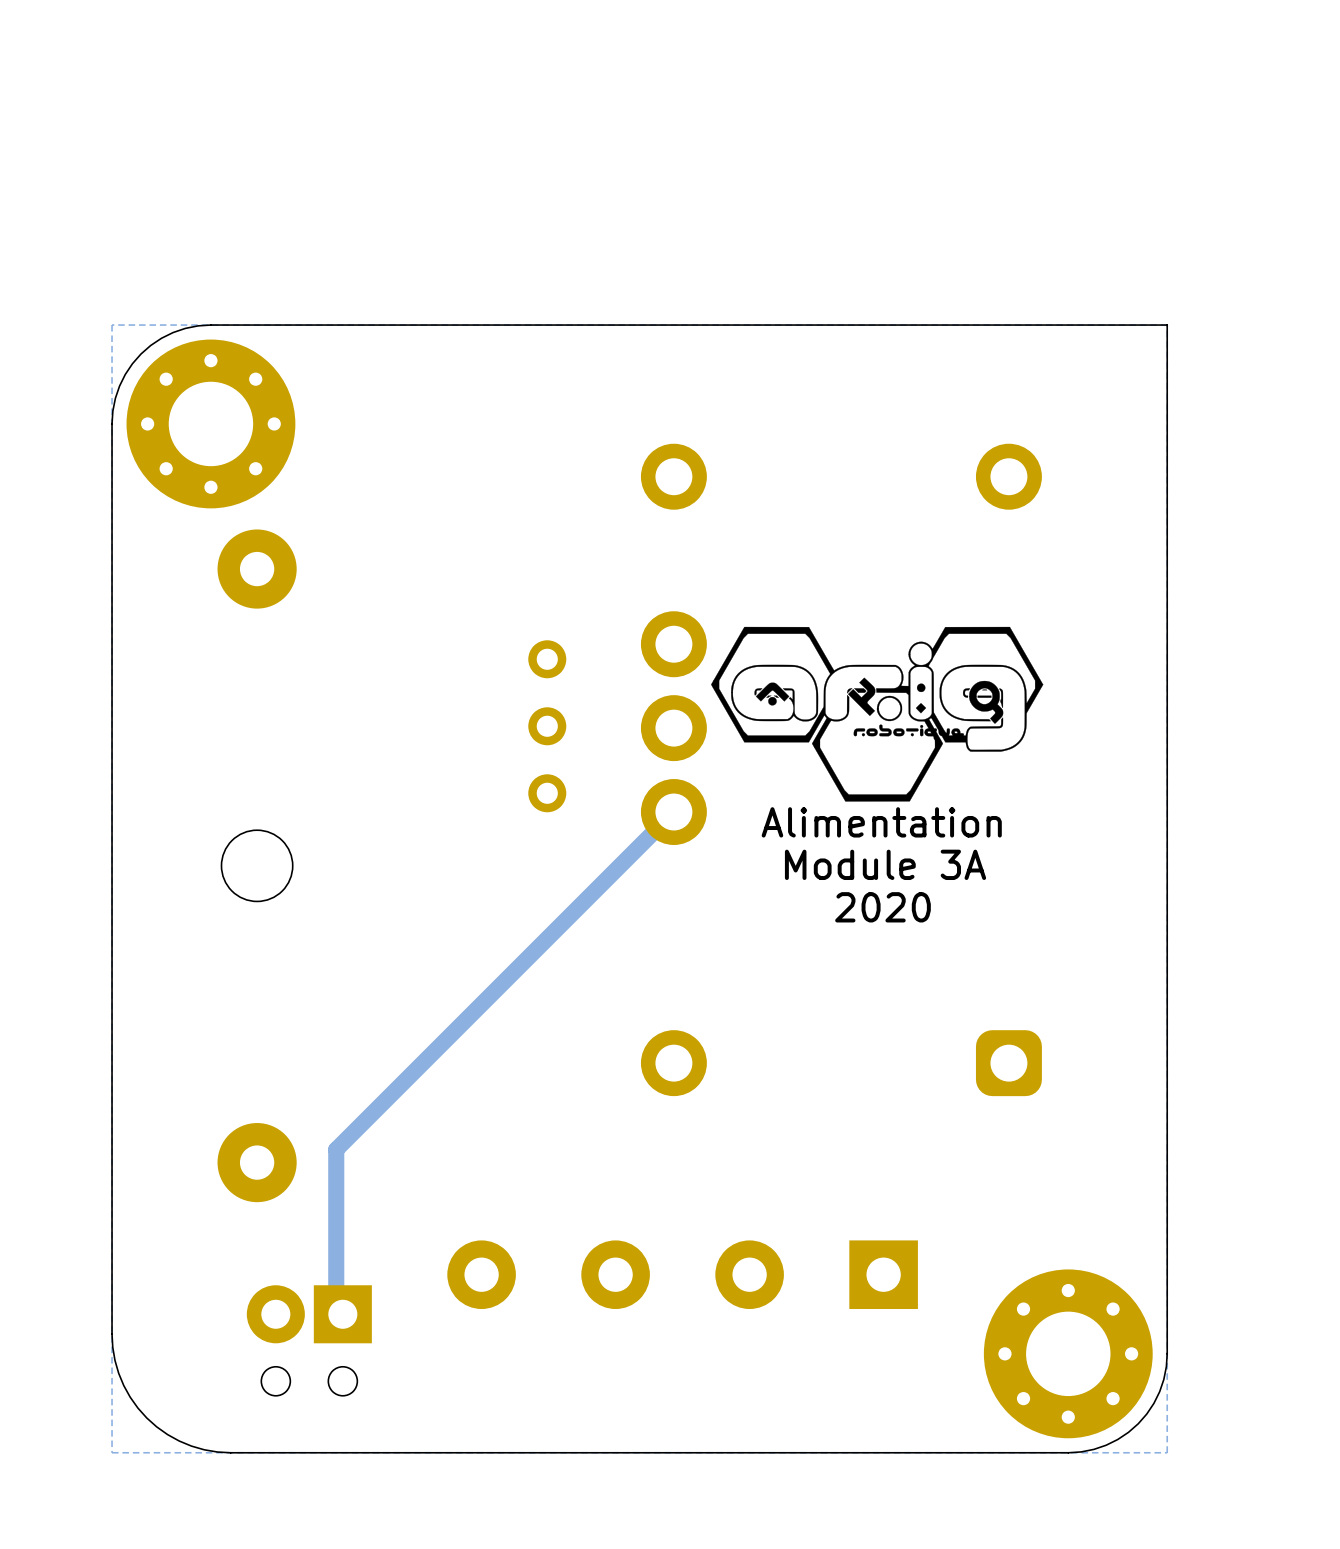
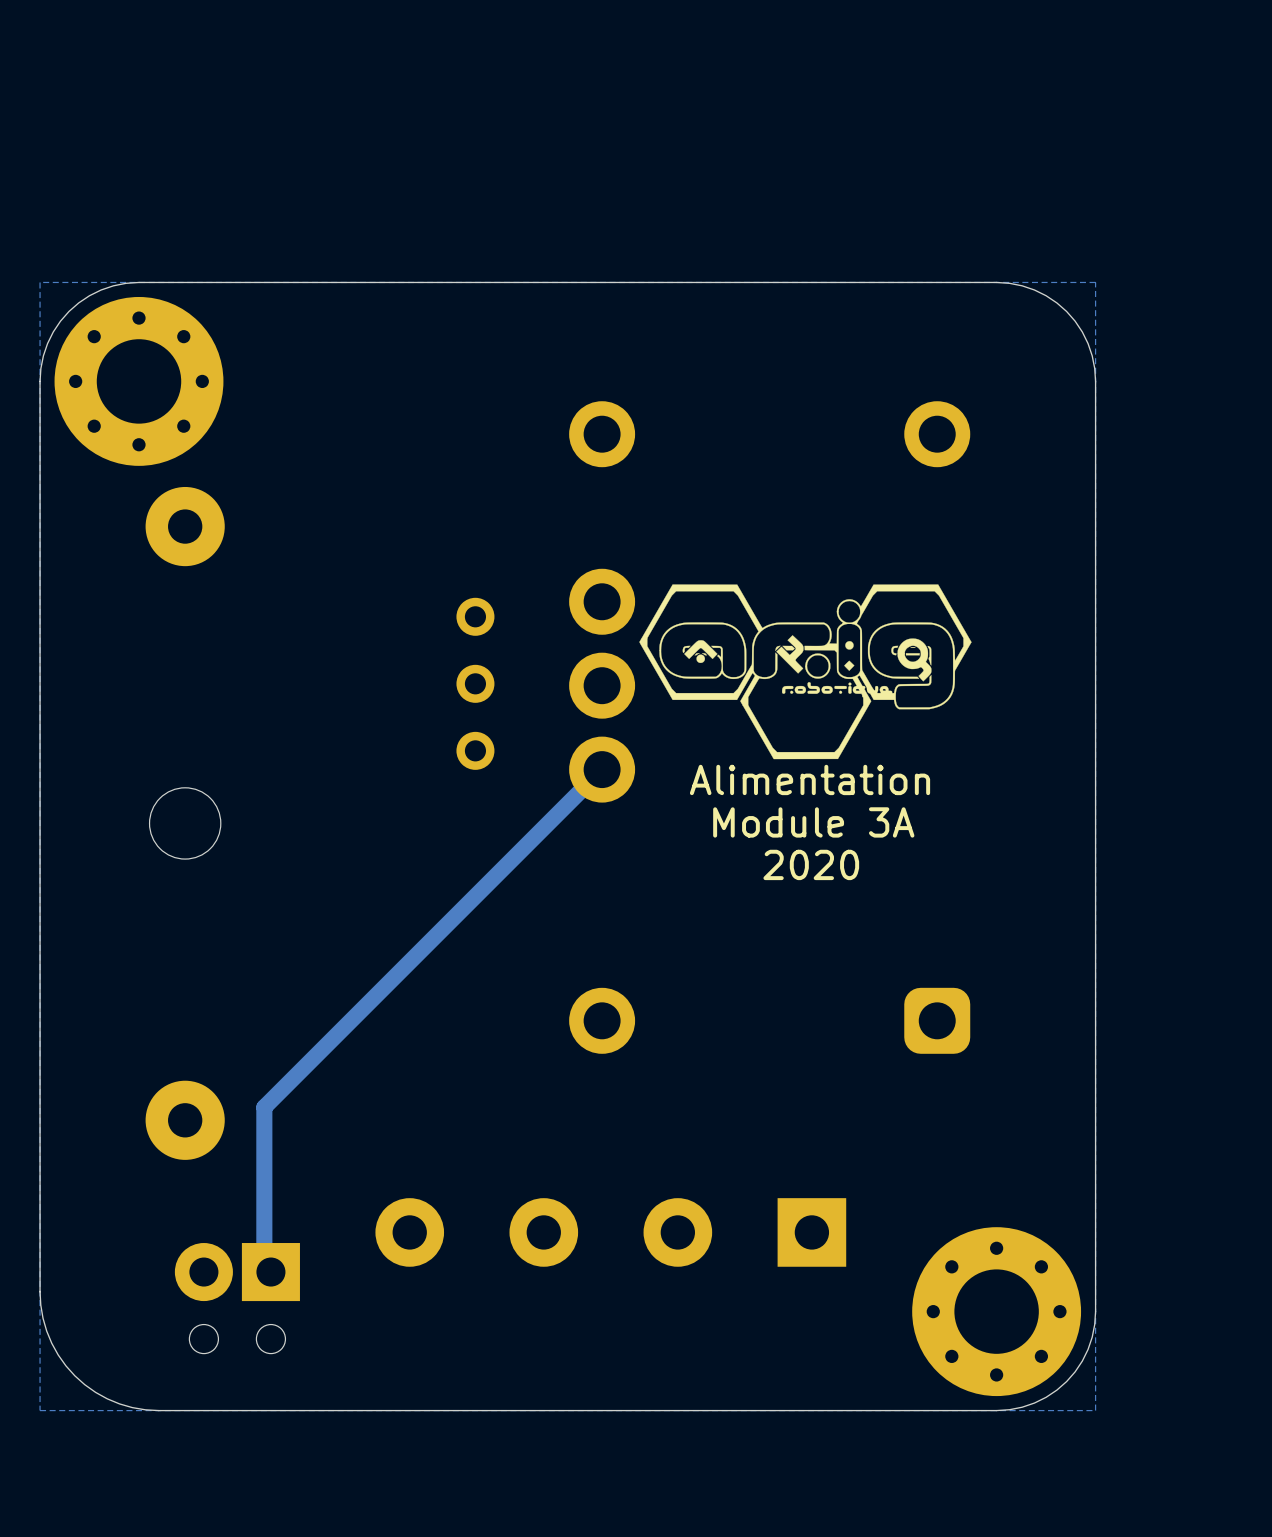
board edge: (1068, 325) (1167, 325) (1167, 423) -> (996, 282) (1009, 283) (1034, 290) (1056, 302) (1066, 311) (1075, 321) (1088, 343) (1094, 368) (1095, 381)

